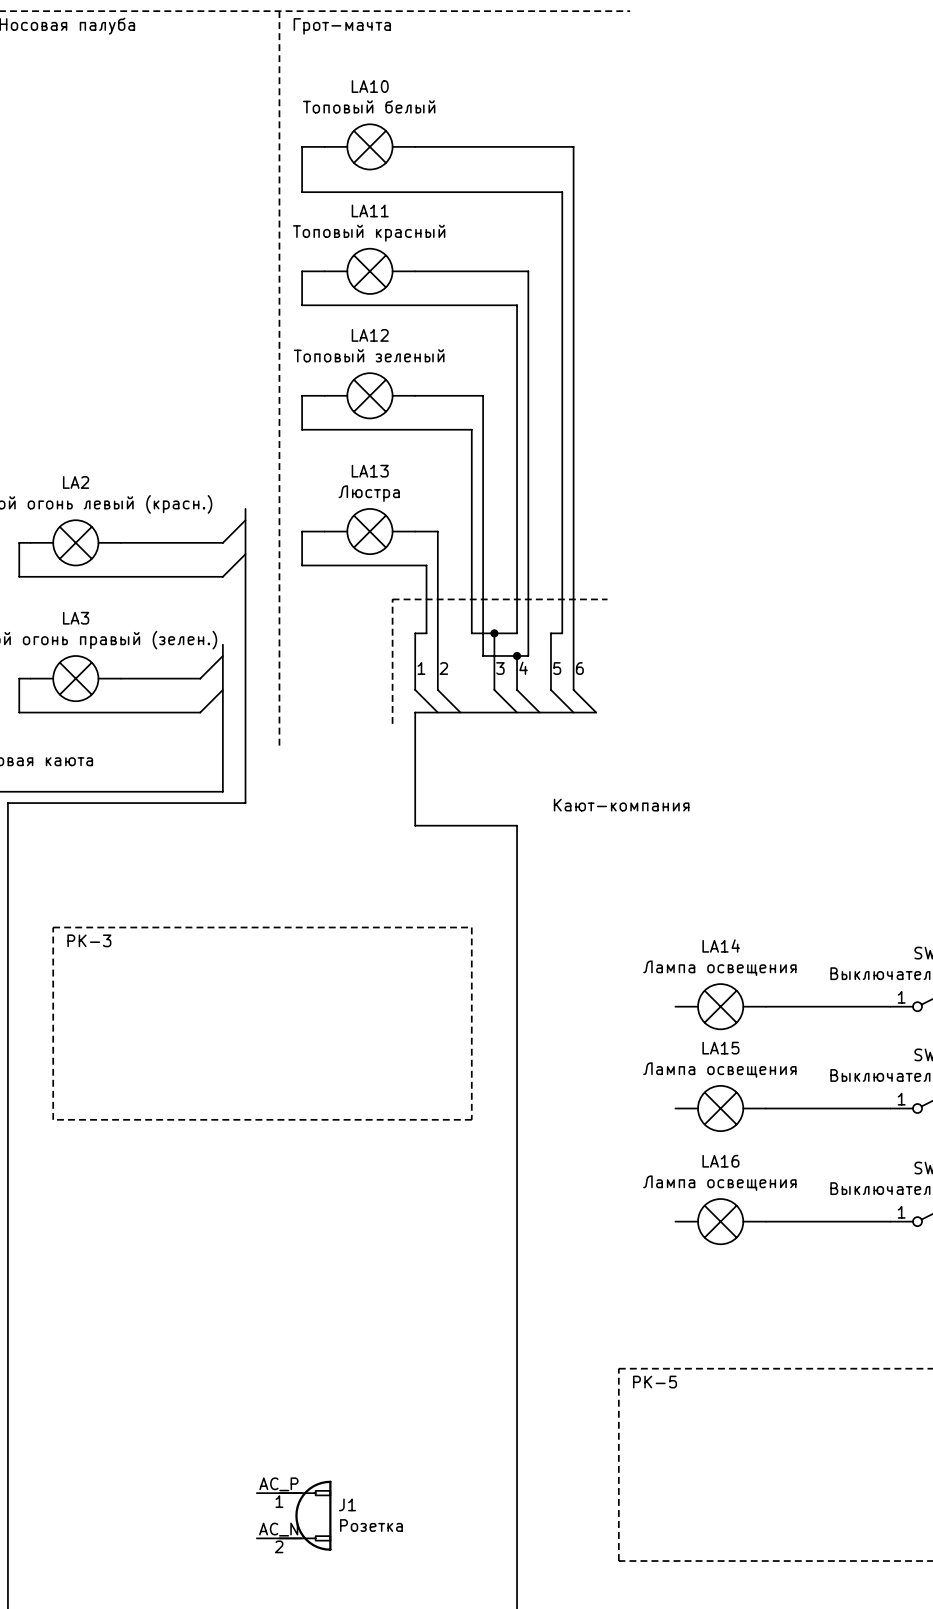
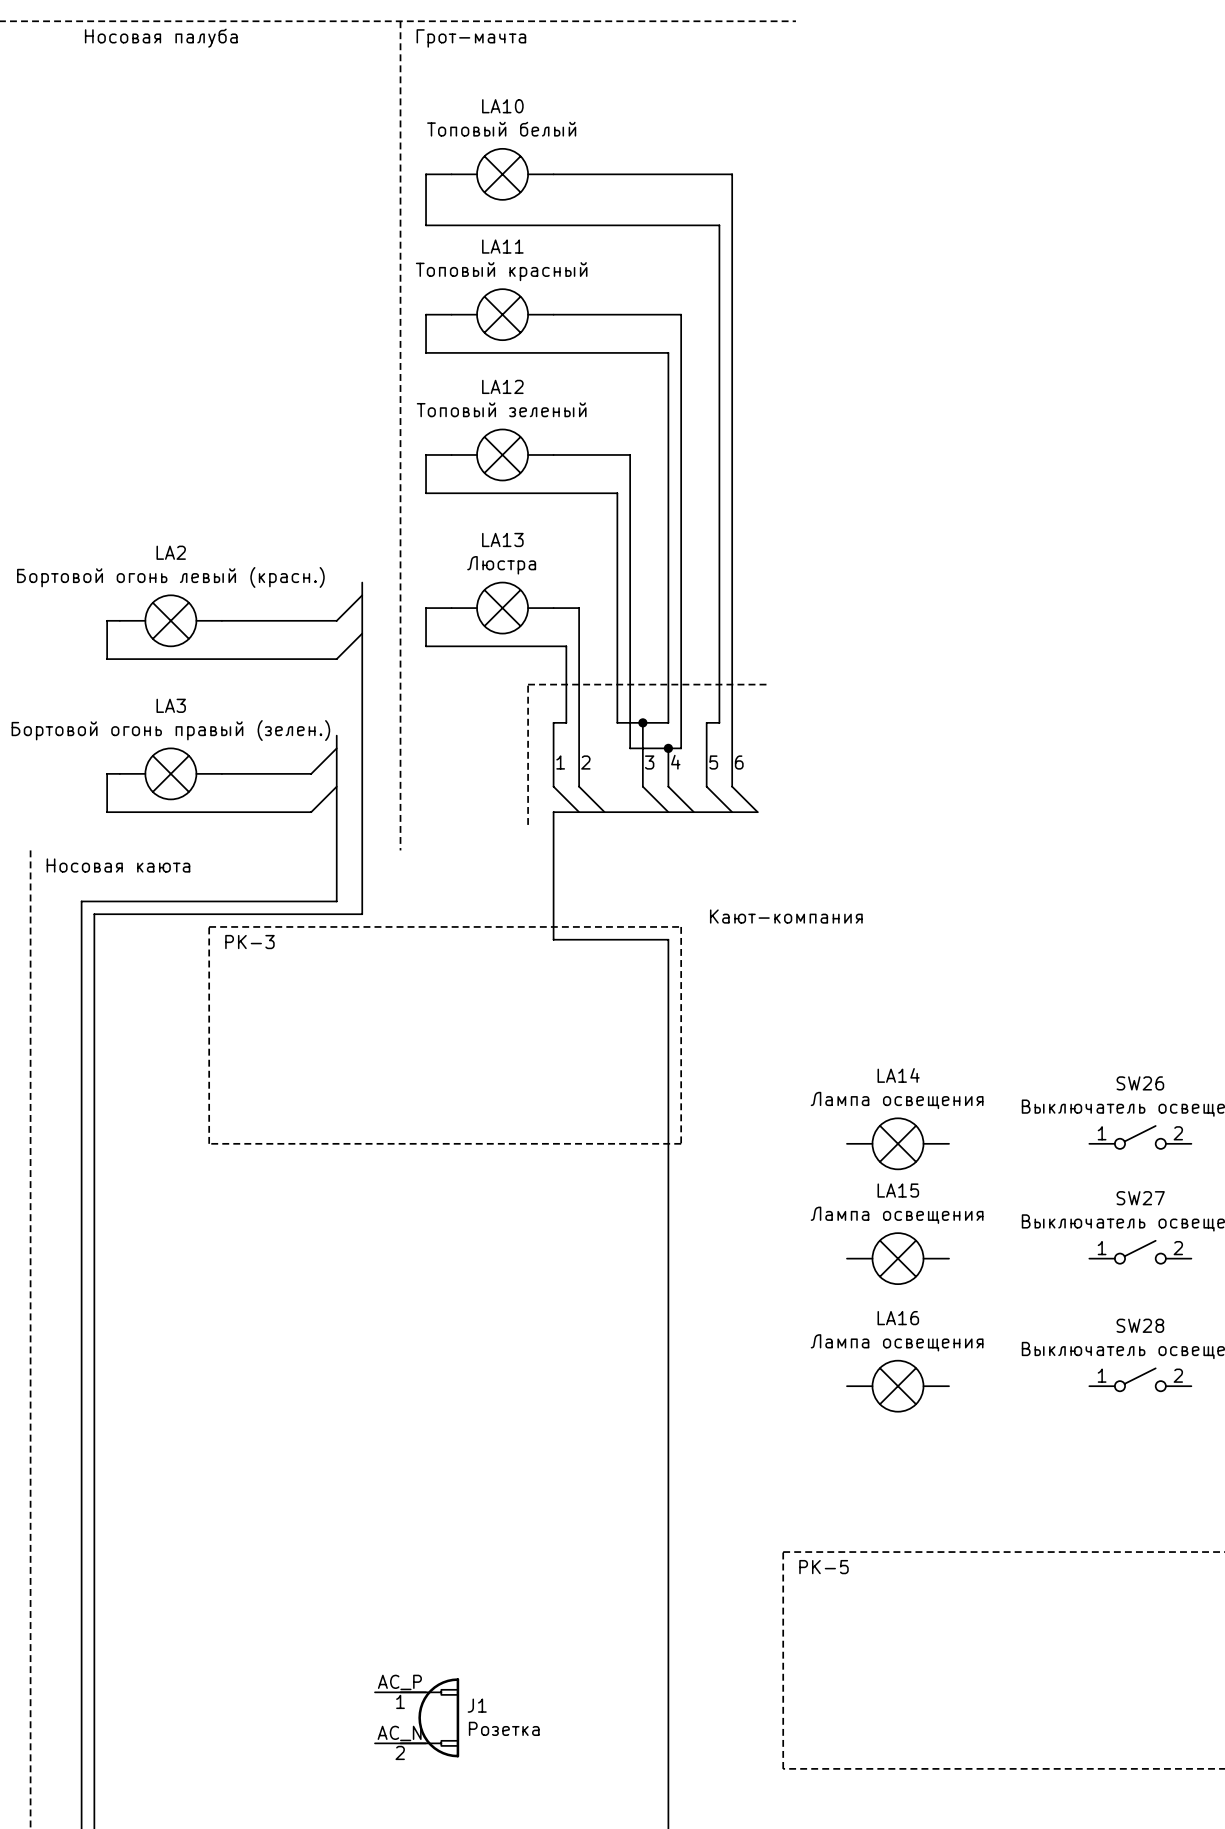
line: (53, 927) (53, 1119) (471, 1119) (471, 927) (53, 927) -> (209, 926) (209, 1143) (681, 1143) (681, 926) (209, 926)
text position: РК-3 (89, 940) -> РК-3 (249, 942)
wire: (765, 1006) (890, 1006) -> none
wire: (765, 1108) (890, 1108) -> none
wire: (765, 1221) (890, 1221) -> none

